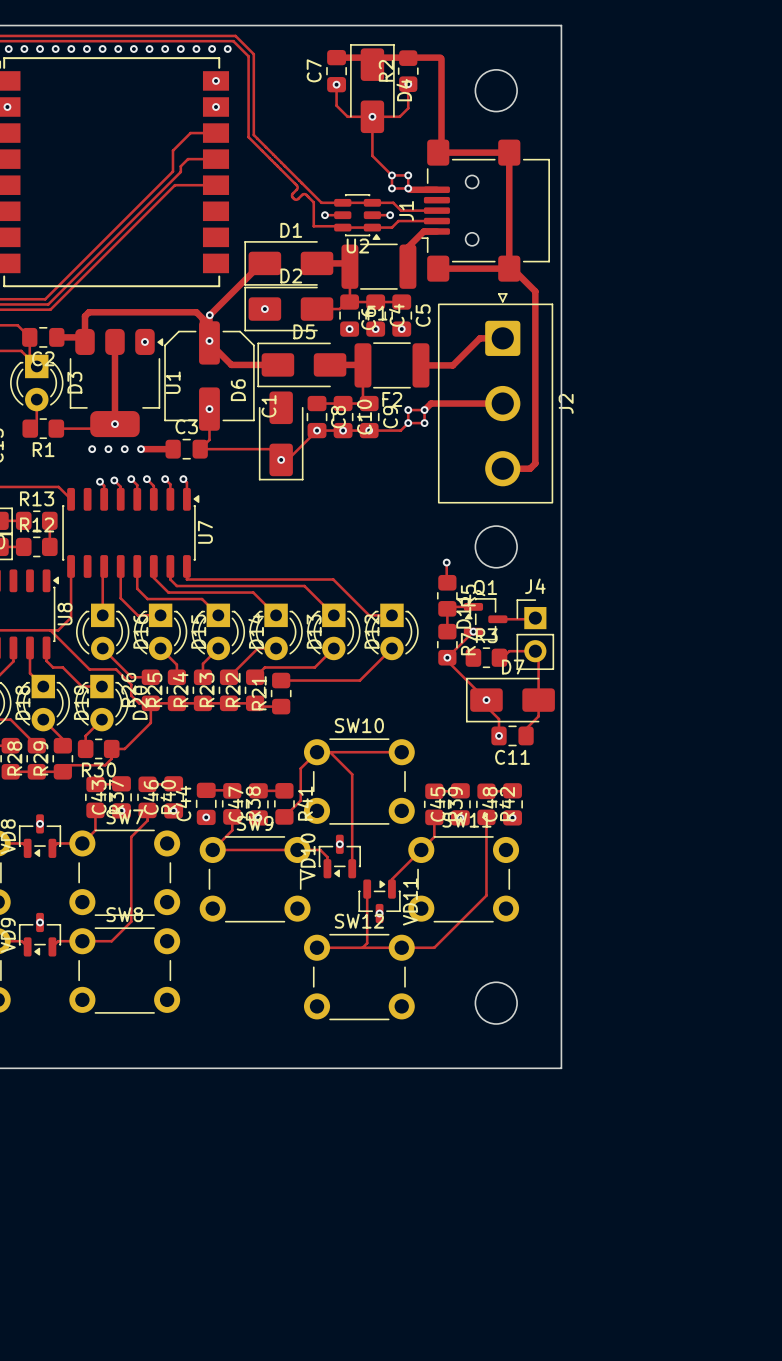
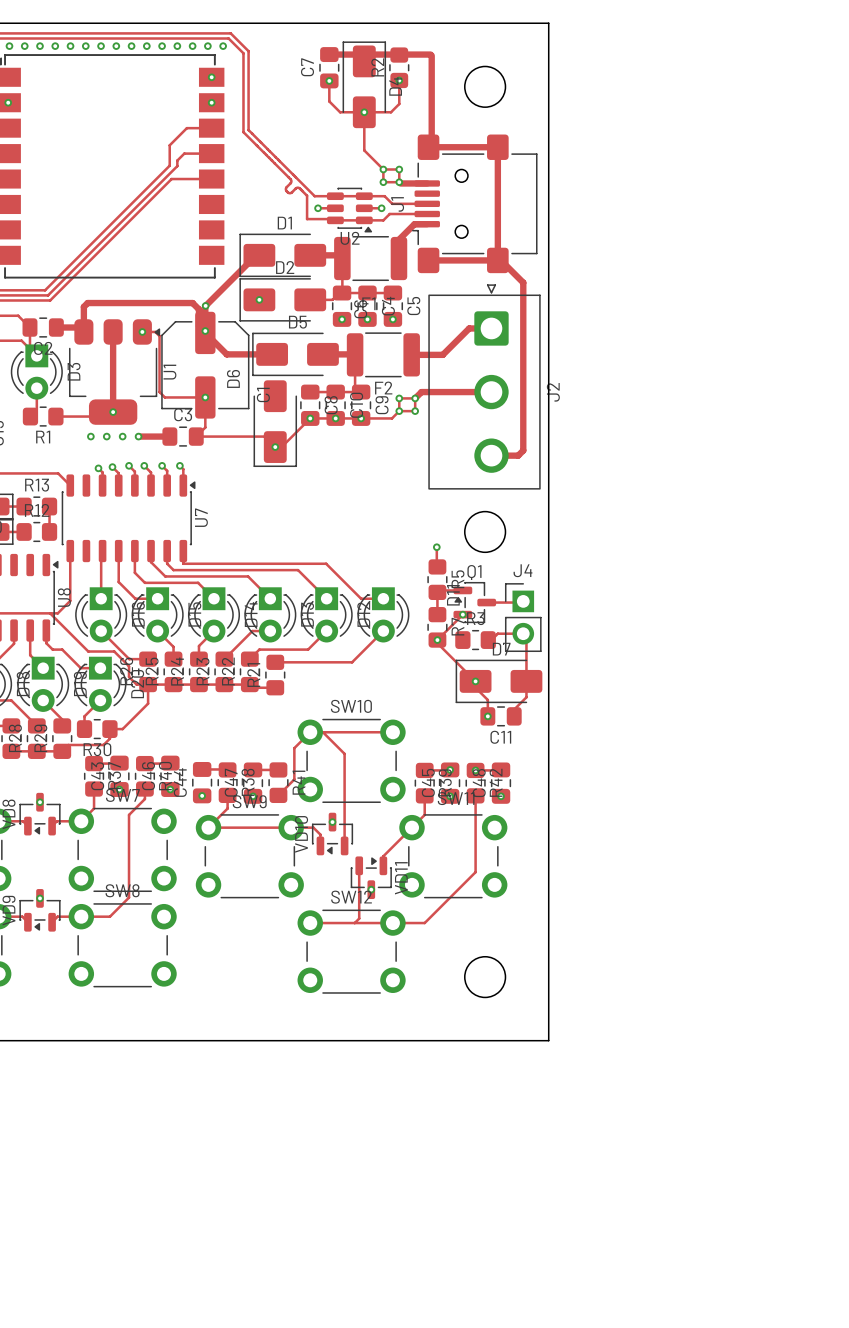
track: none -> (142, 331) (155, 331) (159, 336) (159, 392) (164, 397) (205, 397)
via: none -> (450, 769)
via: none -> (475, 770)

